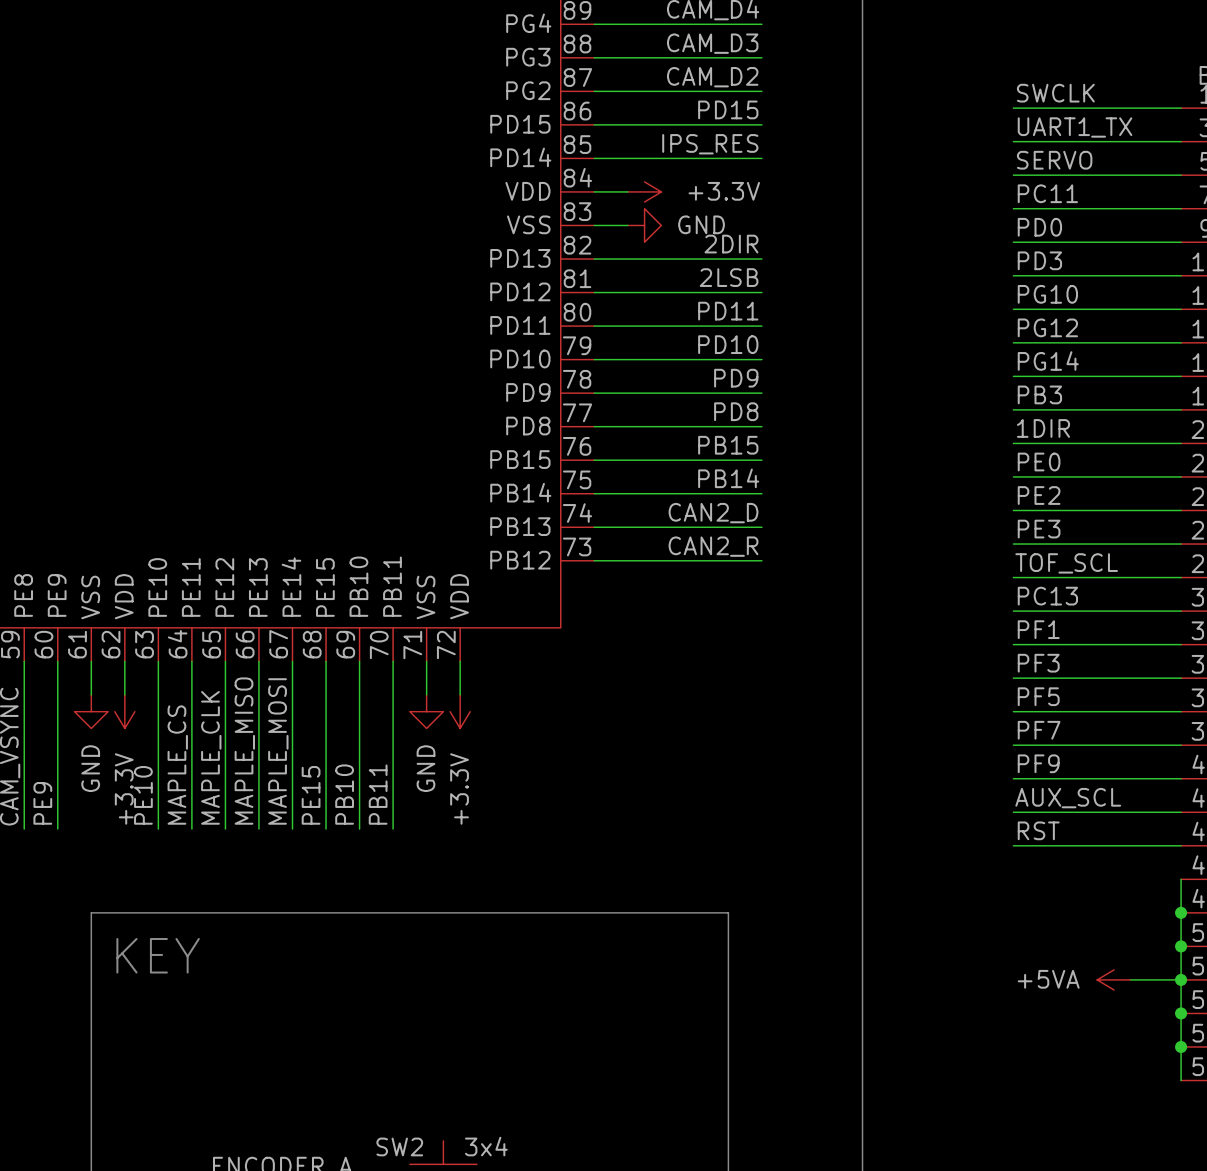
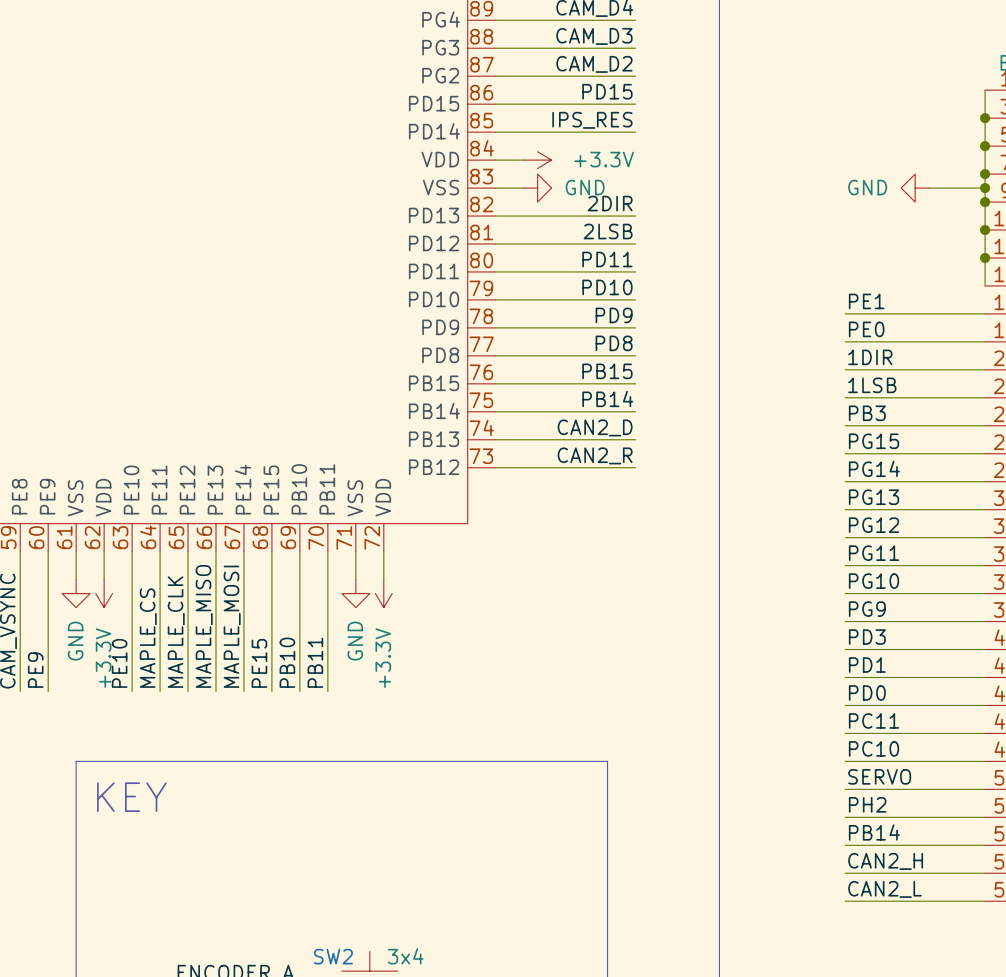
label: SWCLK (1055, 93) -> none
wire: (1013, 108) (1181, 108) -> (985, 285) (985, 90)
label: UART1_TX (1075, 127) -> none
wire: (1013, 141) (1181, 141) -> none
junction: none -> (985, 118)
label: SERVO (1054, 160) -> none
wire: (1013, 175) (1181, 175) -> none
junction: none -> (985, 146)
label: PC11 (1047, 193) -> none
wire: (1013, 208) (1181, 208) -> none
junction: none -> (985, 174)
power symbol: none -> GND (915, 188)
wire: none -> (929, 188) (985, 188)
junction: none -> (985, 188)
label: PD0 (1039, 227) -> none
wire: (1013, 242) (1181, 242) -> none
junction: none -> (985, 202)
label: PD3 (1039, 260) -> none
wire: (1013, 275) (1181, 275) -> none
junction: none -> (985, 230)
label: PG10 (1047, 294) -> none
wire: (1013, 309) (1181, 309) -> none
junction: none -> (985, 257)
label: PG12 (1047, 327) -> none
wire: (1013, 342) (1181, 342) -> none
label: PG14 (1048, 361) -> PE1 (866, 301)
label: PB3 (1039, 394) -> PE0 (866, 329)
label: PE0 (1039, 462) -> 1LSB (872, 385)
label: PE2 (1039, 495) -> PB3 (867, 413)
label: PE3 (1039, 529) -> PG15 (873, 441)
label: TOF_SCL (1066, 563) -> PG14 (874, 468)
label: PC13 (1047, 596) -> PG13 (873, 497)
label: PF1 (1038, 629) -> PG12 (873, 525)
label: PF3 (1038, 663) -> PG11 (873, 553)
label: PF5 (1038, 696) -> PG10 (873, 581)
label: PF7 (1039, 730) -> PG9 (867, 609)
label: PF9 (1038, 763) -> PD3 (867, 637)
label: AUX_SCL (1068, 798) -> PD1 (867, 665)
label: RST (1038, 830) -> PD0 (867, 692)
label: none -> PC11 (873, 720)
wire: (1181, 879) (1181, 1080) -> (985, 733) (845, 733)
label: none -> PC10 (873, 748)
wire: none -> (845, 761) (985, 761)
junction: (1181, 912) -> none
label: none -> SERVO (879, 776)
wire: none -> (845, 789) (985, 789)
junction: (1181, 946) -> none
label: none -> PH2 (867, 804)
wire: none -> (845, 817) (943, 817)
power symbol: +5VA (1114, 979) -> none
junction: (1181, 979) -> none
label: none -> PB14 (874, 832)
wire: none -> (845, 845) (985, 845)
junction: (1181, 1013) -> none
label: none -> CAN2_H (885, 861)
wire: none -> (845, 873) (985, 873)
junction: (1181, 1046) -> none
label: none -> CAN2_L (884, 889)
wire: none -> (845, 901) (985, 901)

